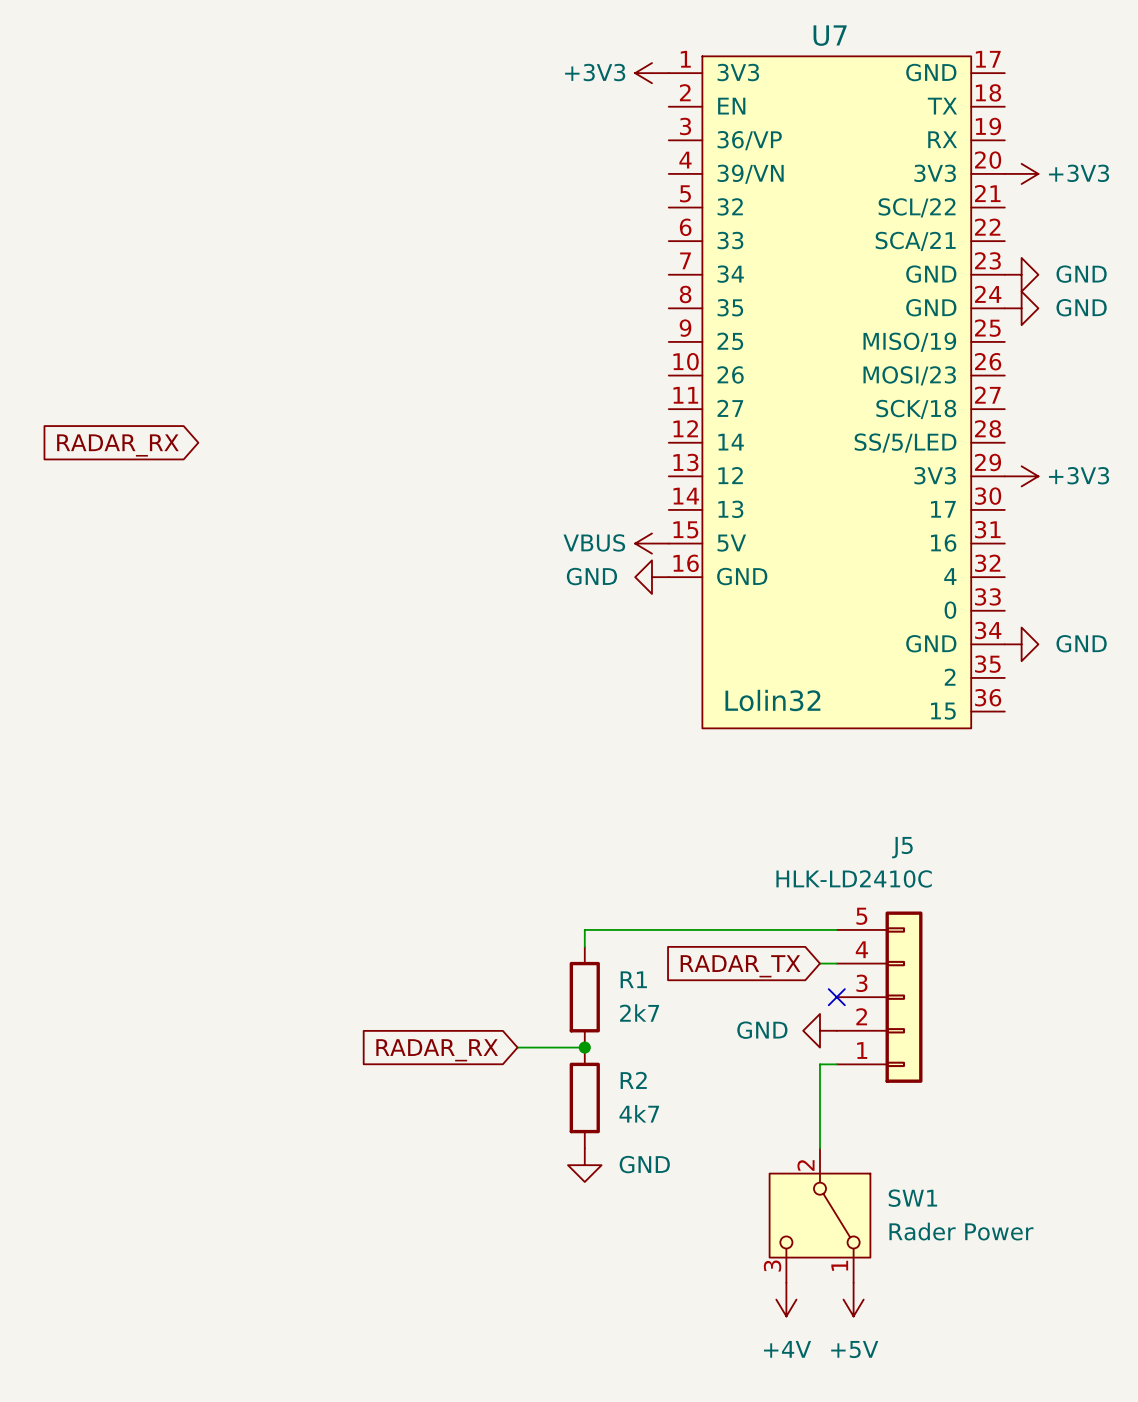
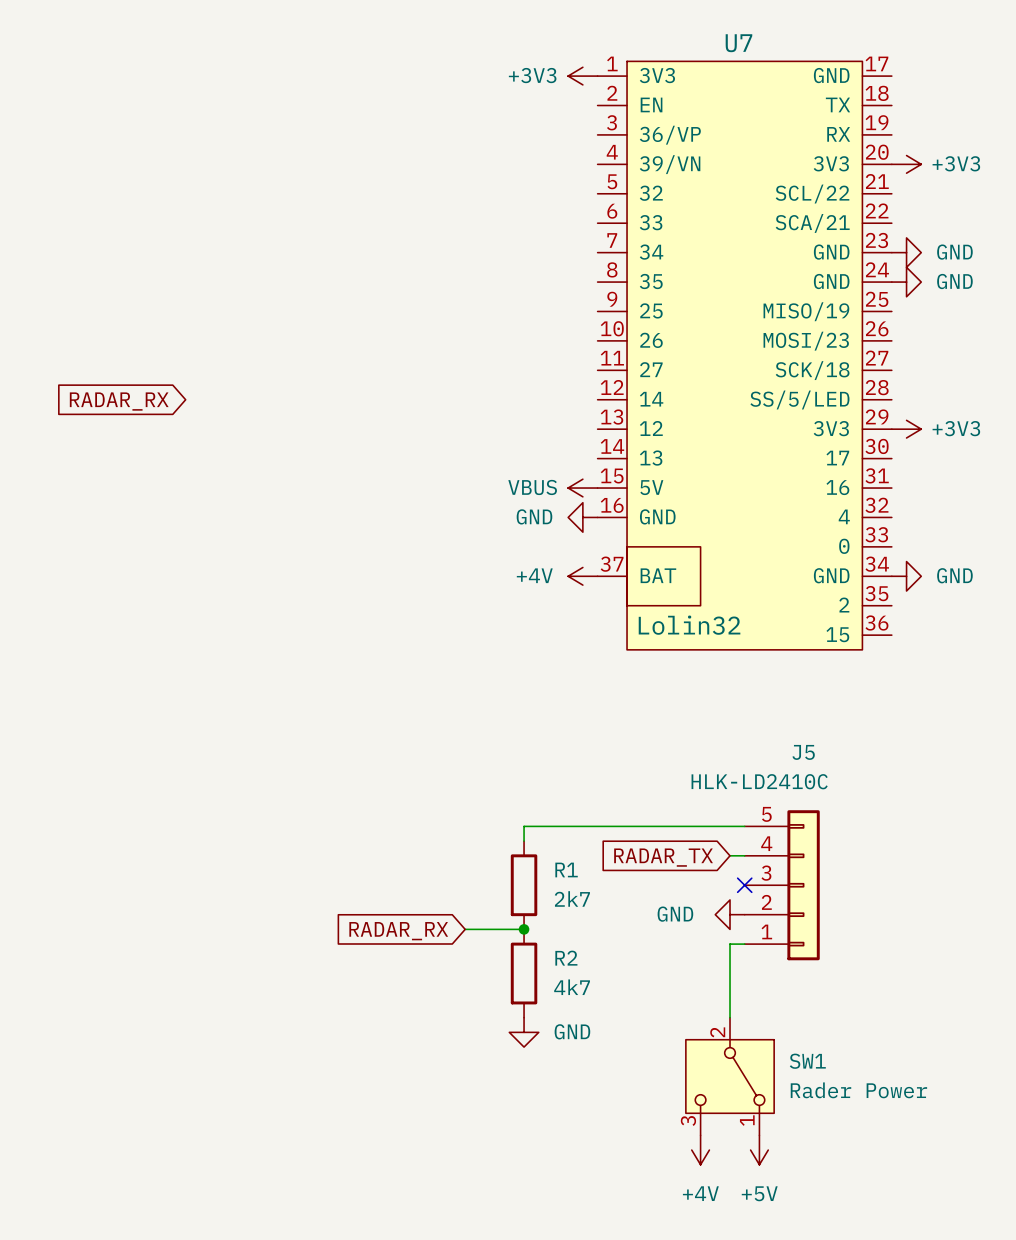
U7 symbol: [668, 56, 1005, 729] -> [597, 61, 892, 650]
power symbol: none -> +4V (582, 576)

